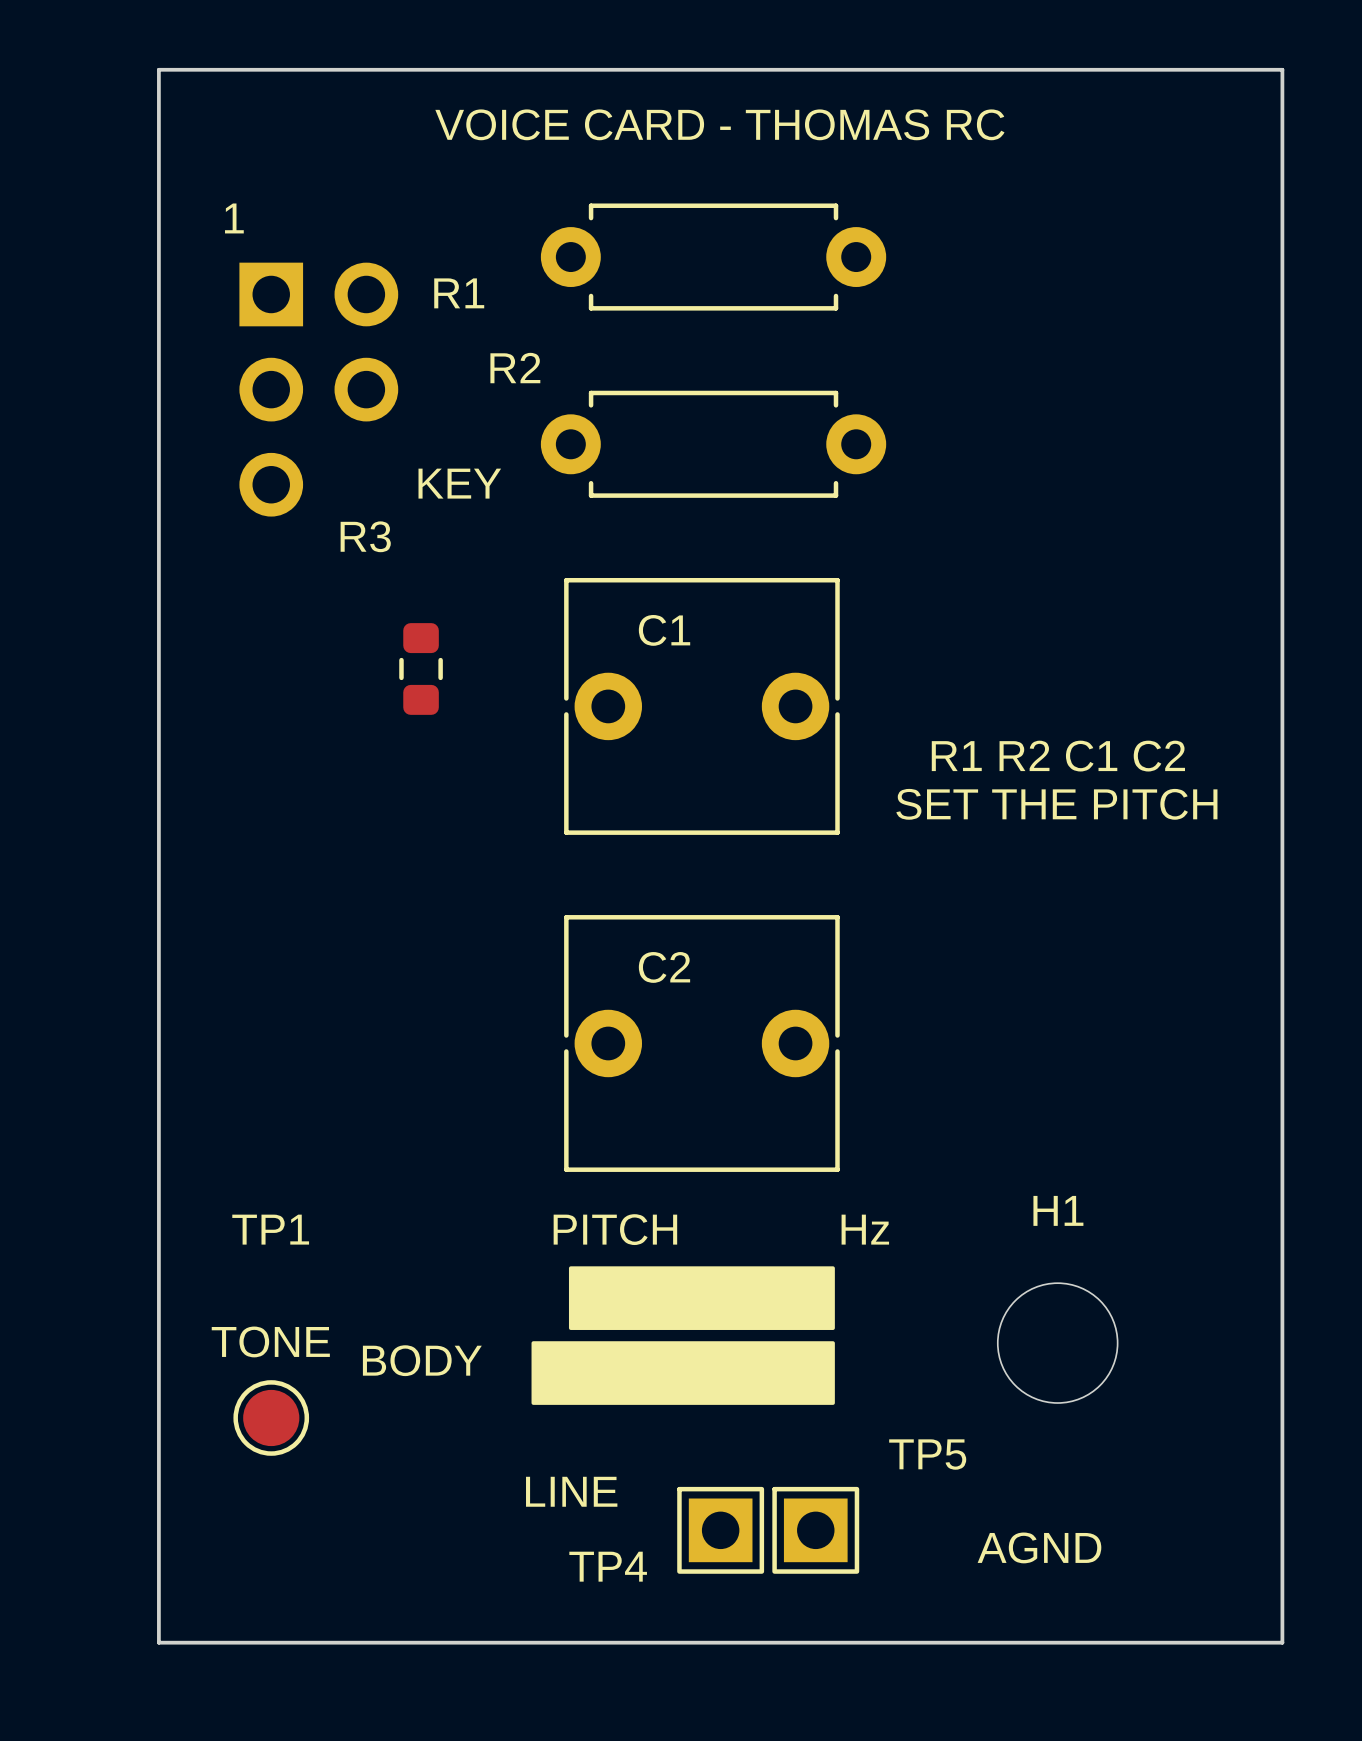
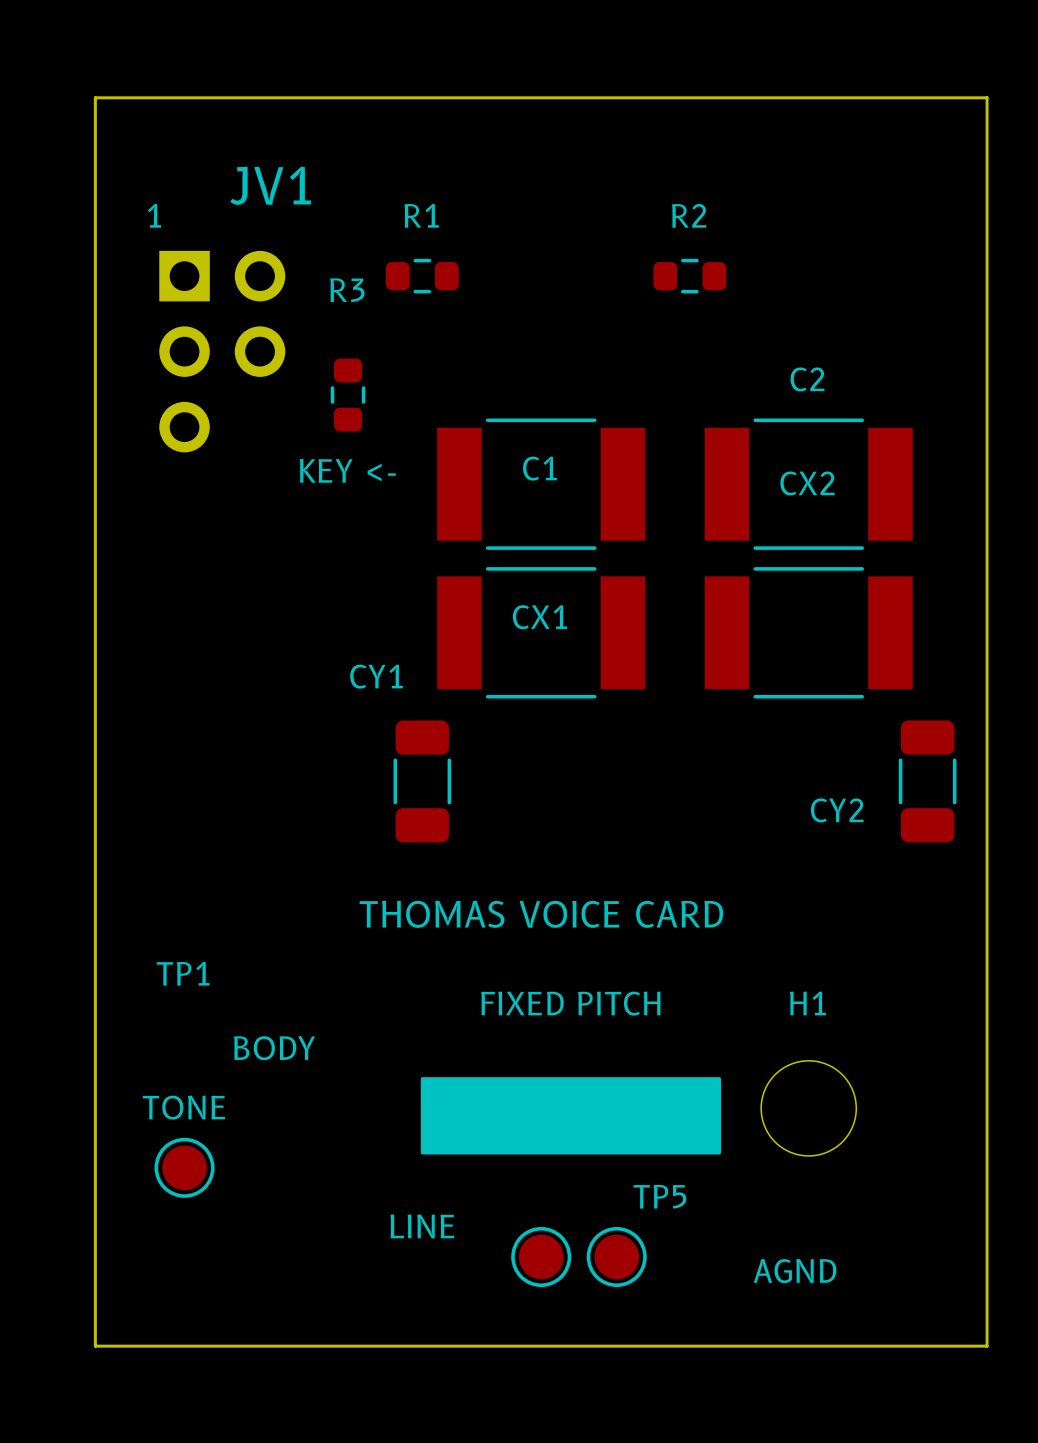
text: VOICE CARD - THOMAS RC (719, 124) -> none
JV1 name: none -> JV1 (270, 185)
R1 footprint: [540, 203, 887, 311] -> [385, 258, 459, 294]
R1 name position: R1 (459, 293) -> R1 (421, 215)
R2 name position: R2 (515, 368) -> R2 (689, 215)
R2 footprint: [540, 390, 887, 498] -> [653, 258, 727, 294]
text: KEY (459, 483) -> KEY <- (347, 470)
R3 name position: R3 (365, 536) -> R3 (347, 290)
C1 footprint: [564, 577, 840, 835] -> [437, 418, 646, 550]
R3 position: (421, 668) -> (348, 395)
CX1: none -> (541, 632)
CX2: none -> (808, 632)
text: R1 R2 C1 C2 (1058, 756) -> none
text: SET THE PITCH (1056, 804) -> none
C2 footprint: [564, 915, 840, 1172] -> [704, 418, 913, 550]
CY1: none -> (422, 781)
CY2: none -> (927, 781)
text: none -> THOMAS VOICE CARD (541, 914)
text: none -> FIXED PITCH (570, 1003)
TP1 name position: TP1 (270, 1229) -> TP1 (183, 973)
text: PITCH Hz (721, 1229) -> none
drawing: [531, 1266, 835, 1405] -> none
drawing: none -> [420, 1077, 722, 1155]
text position: BODY (422, 1360) -> BODY (274, 1048)
TP5 footprint: [772, 1486, 860, 1574] -> [586, 1226, 647, 1288]
TP4: (720, 1530) -> none
part: none -> (541, 1256)

